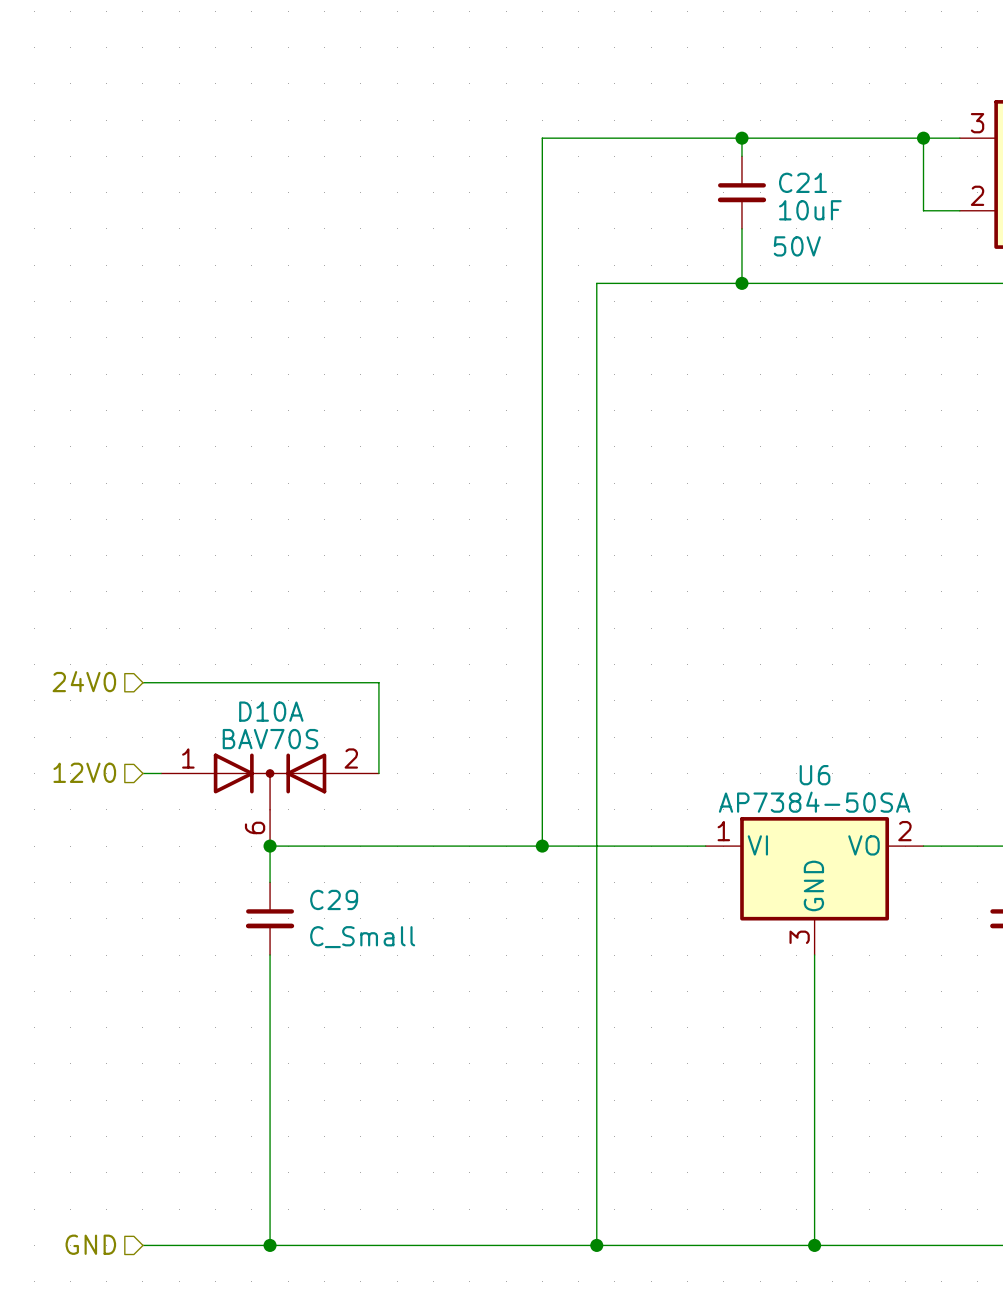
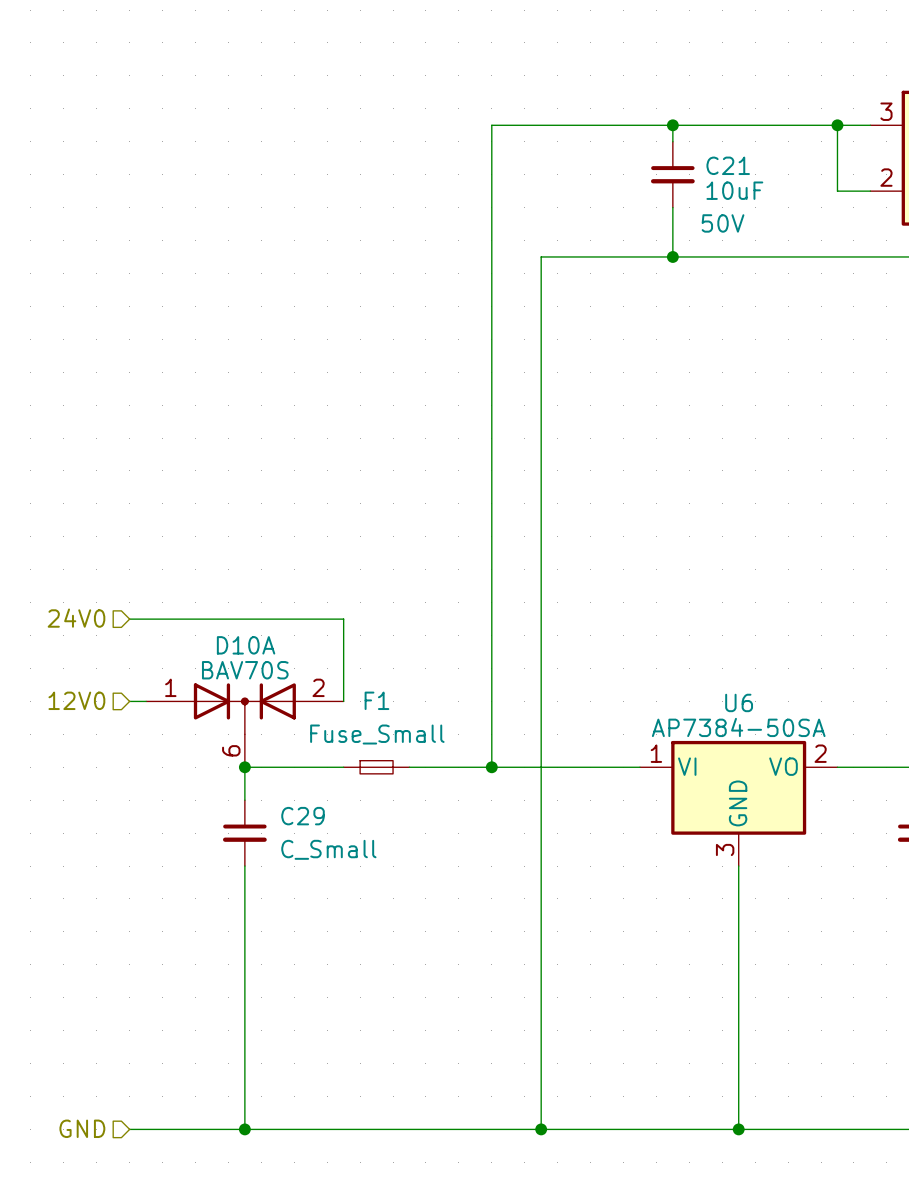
F1: none -> Fuse_Small (376, 767)

